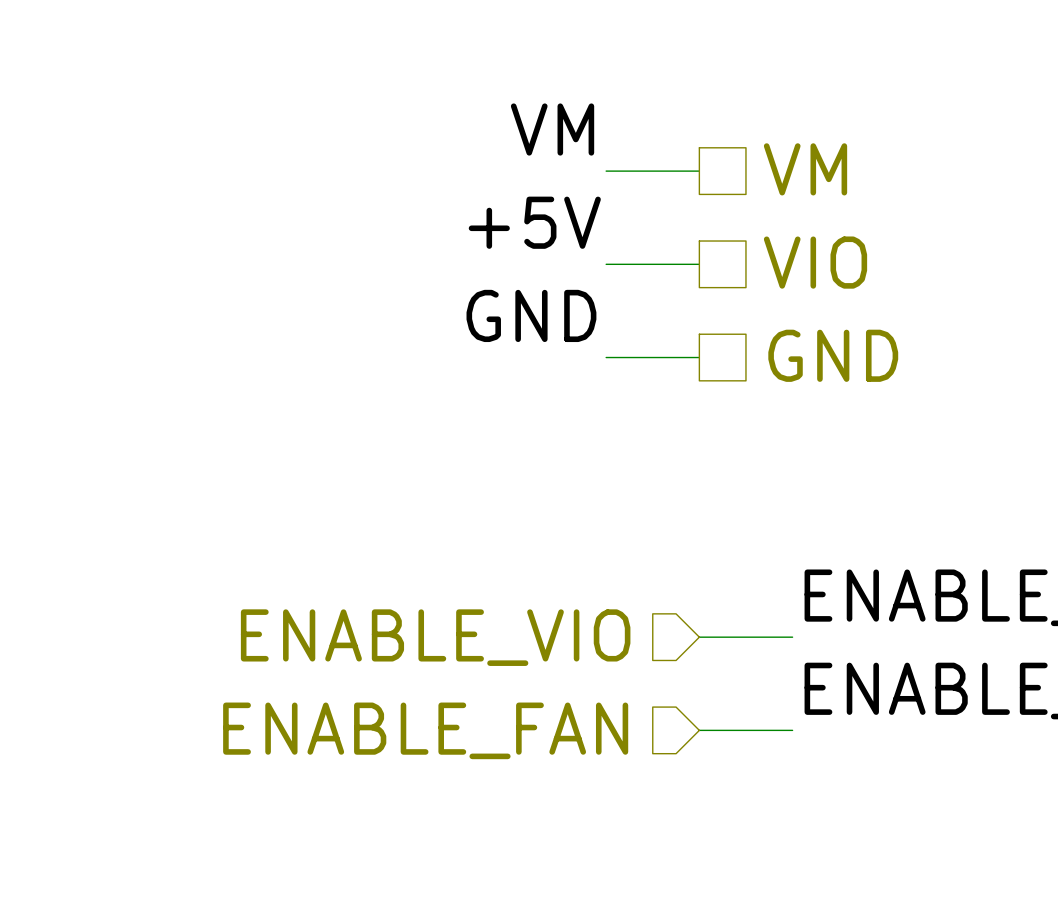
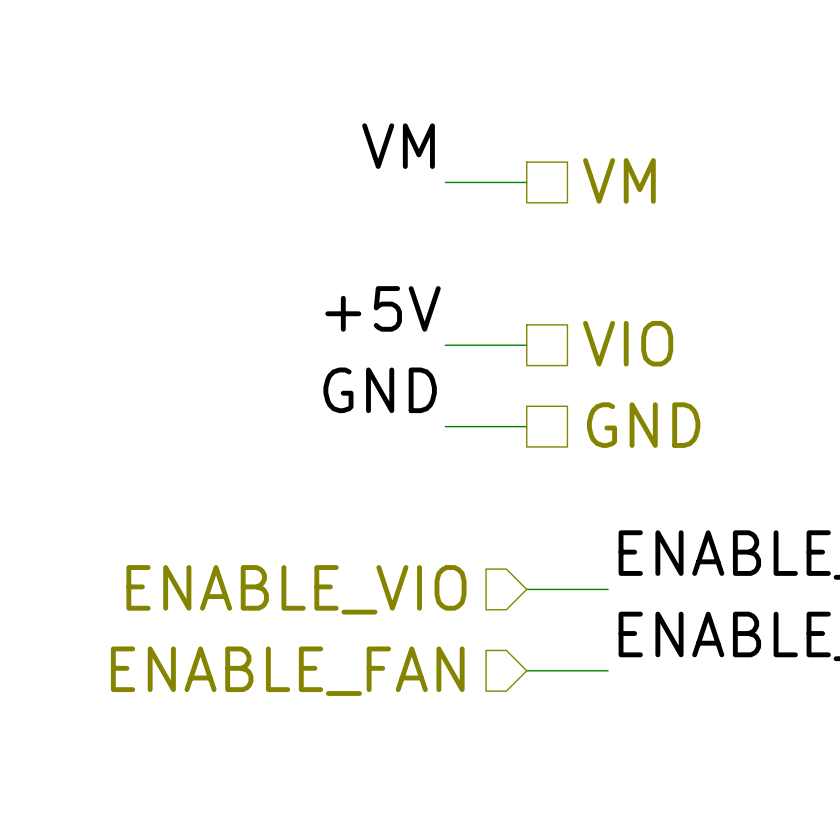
label: +5V (534, 222) -> none
hierarchical label: VIO (815, 262) -> none
wire: (606, 264) (699, 264) -> (445, 426) (526, 426)
label: GND (531, 315) -> +5V (383, 308)
hierarchical label: GND (833, 355) -> VIO (628, 343)
label: none -> GND (380, 390)
hierarchical label: none -> GND (643, 425)

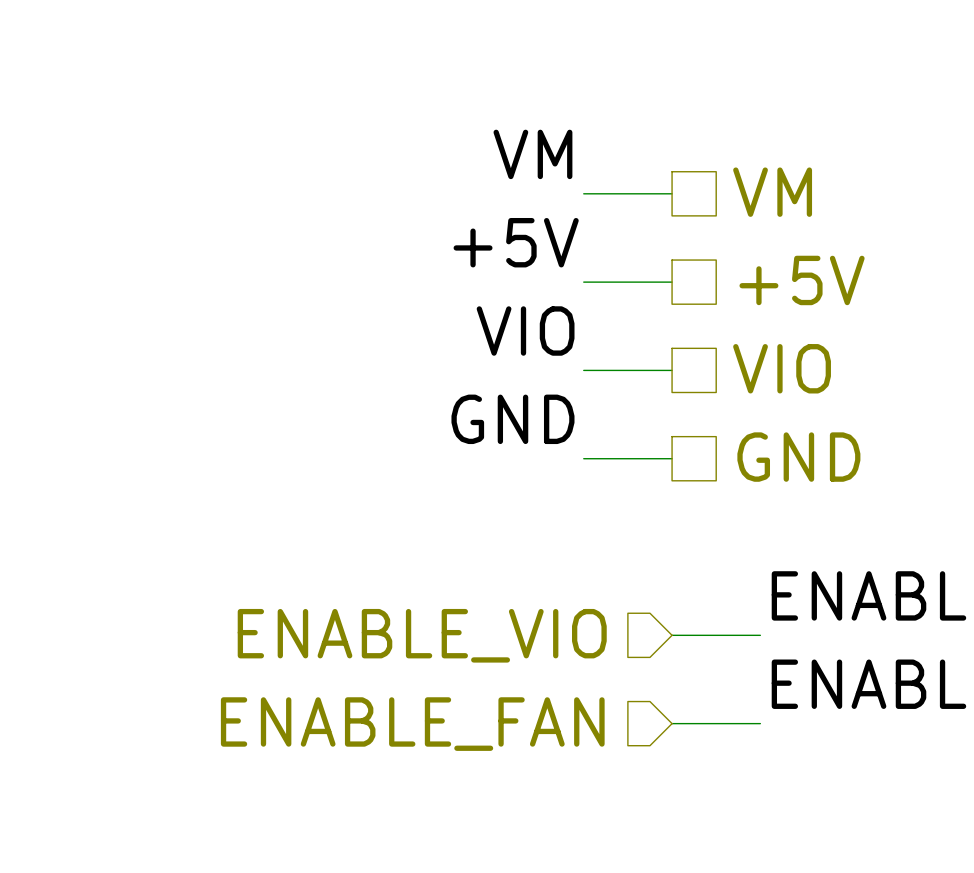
label: none -> +5V (516, 242)
hierarchical label: none -> +5V (802, 280)
wire: none -> (583, 282) (672, 282)
label: +5V (383, 308) -> VIO (525, 331)

